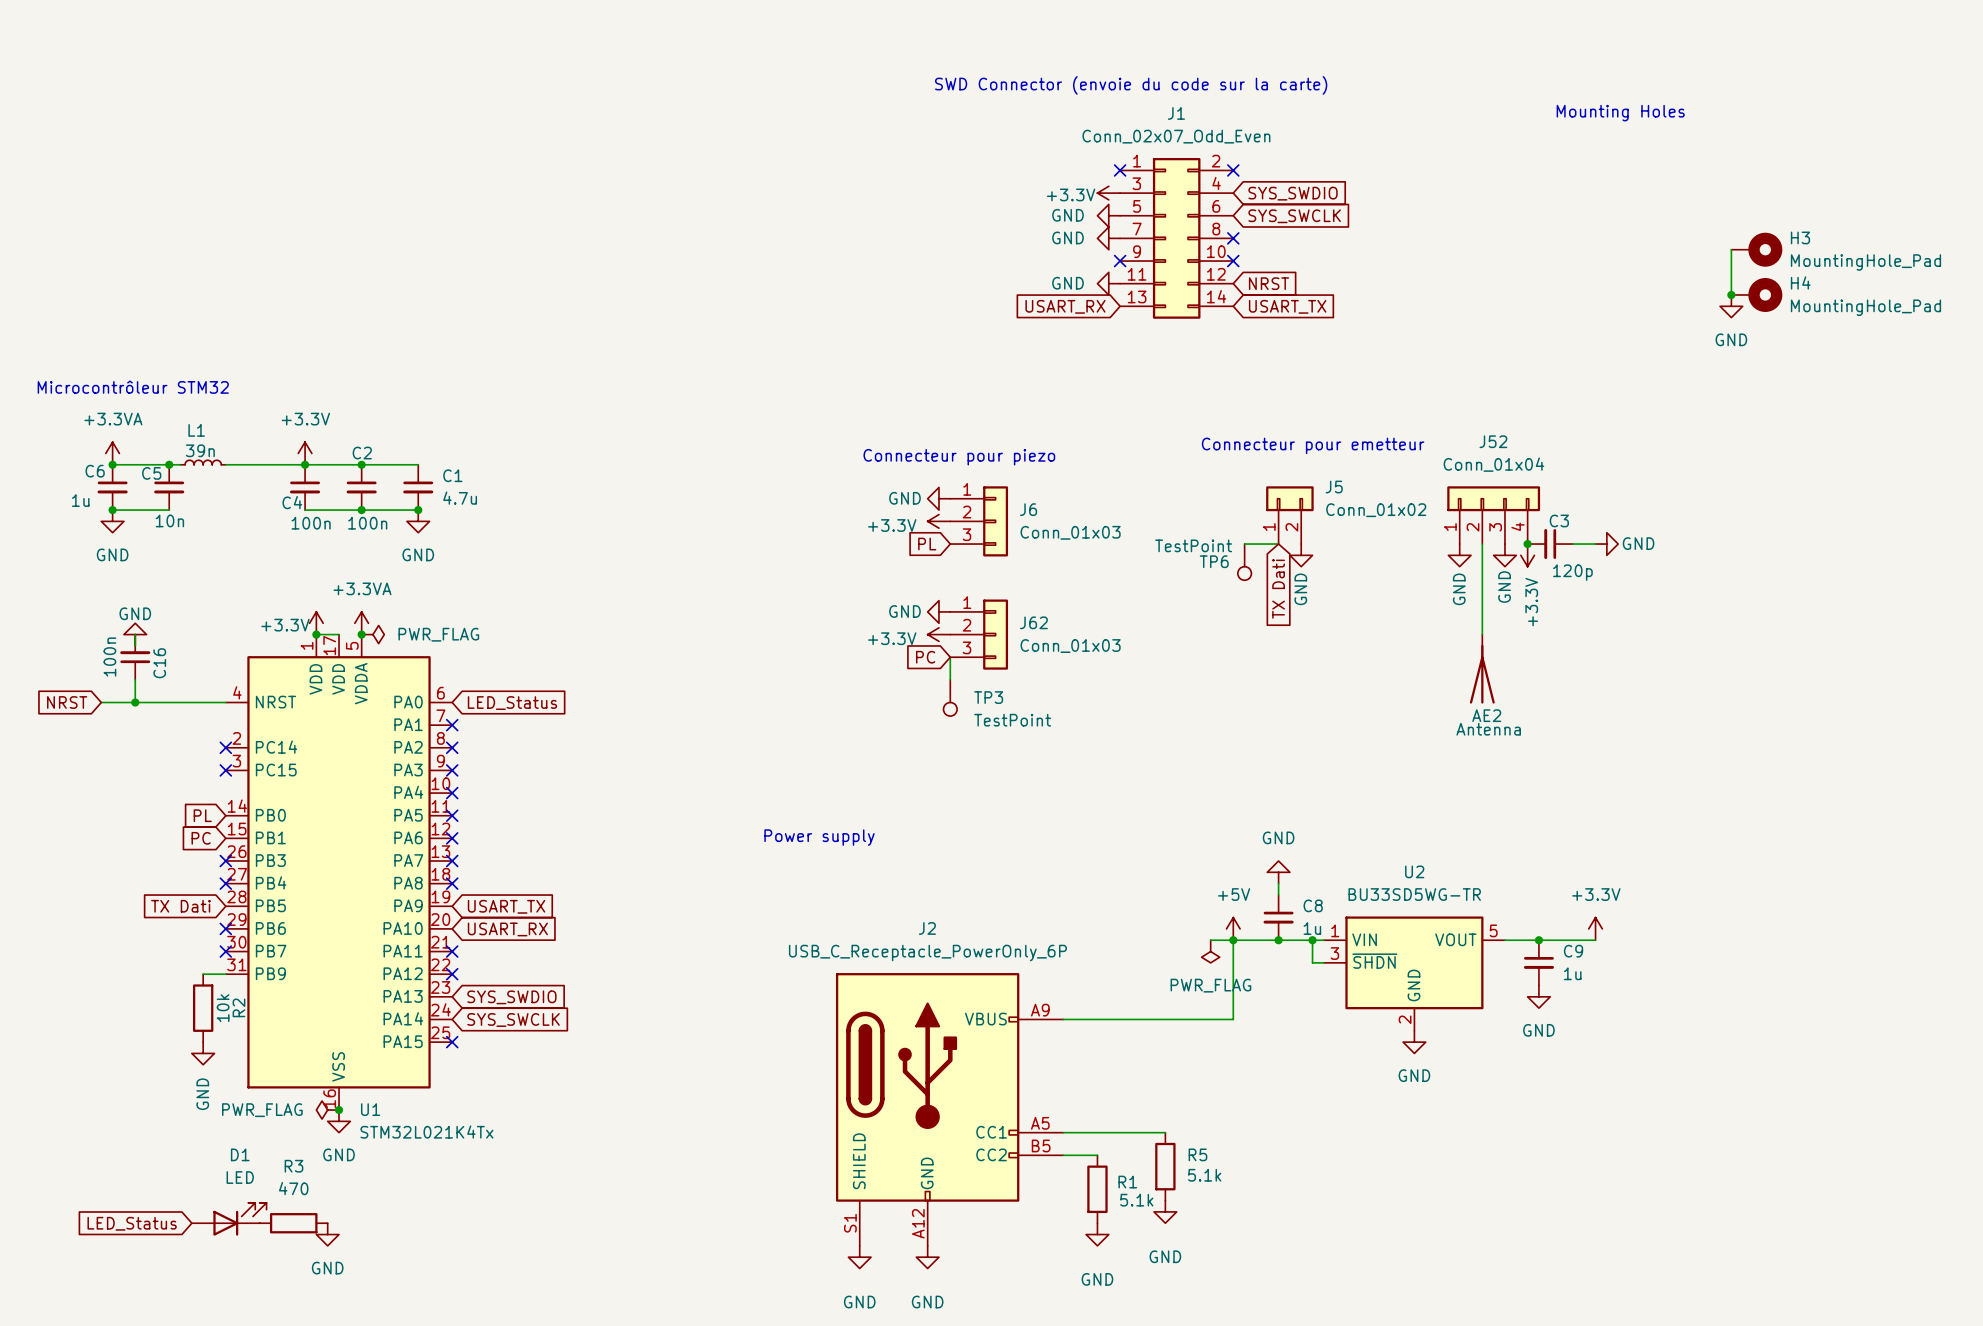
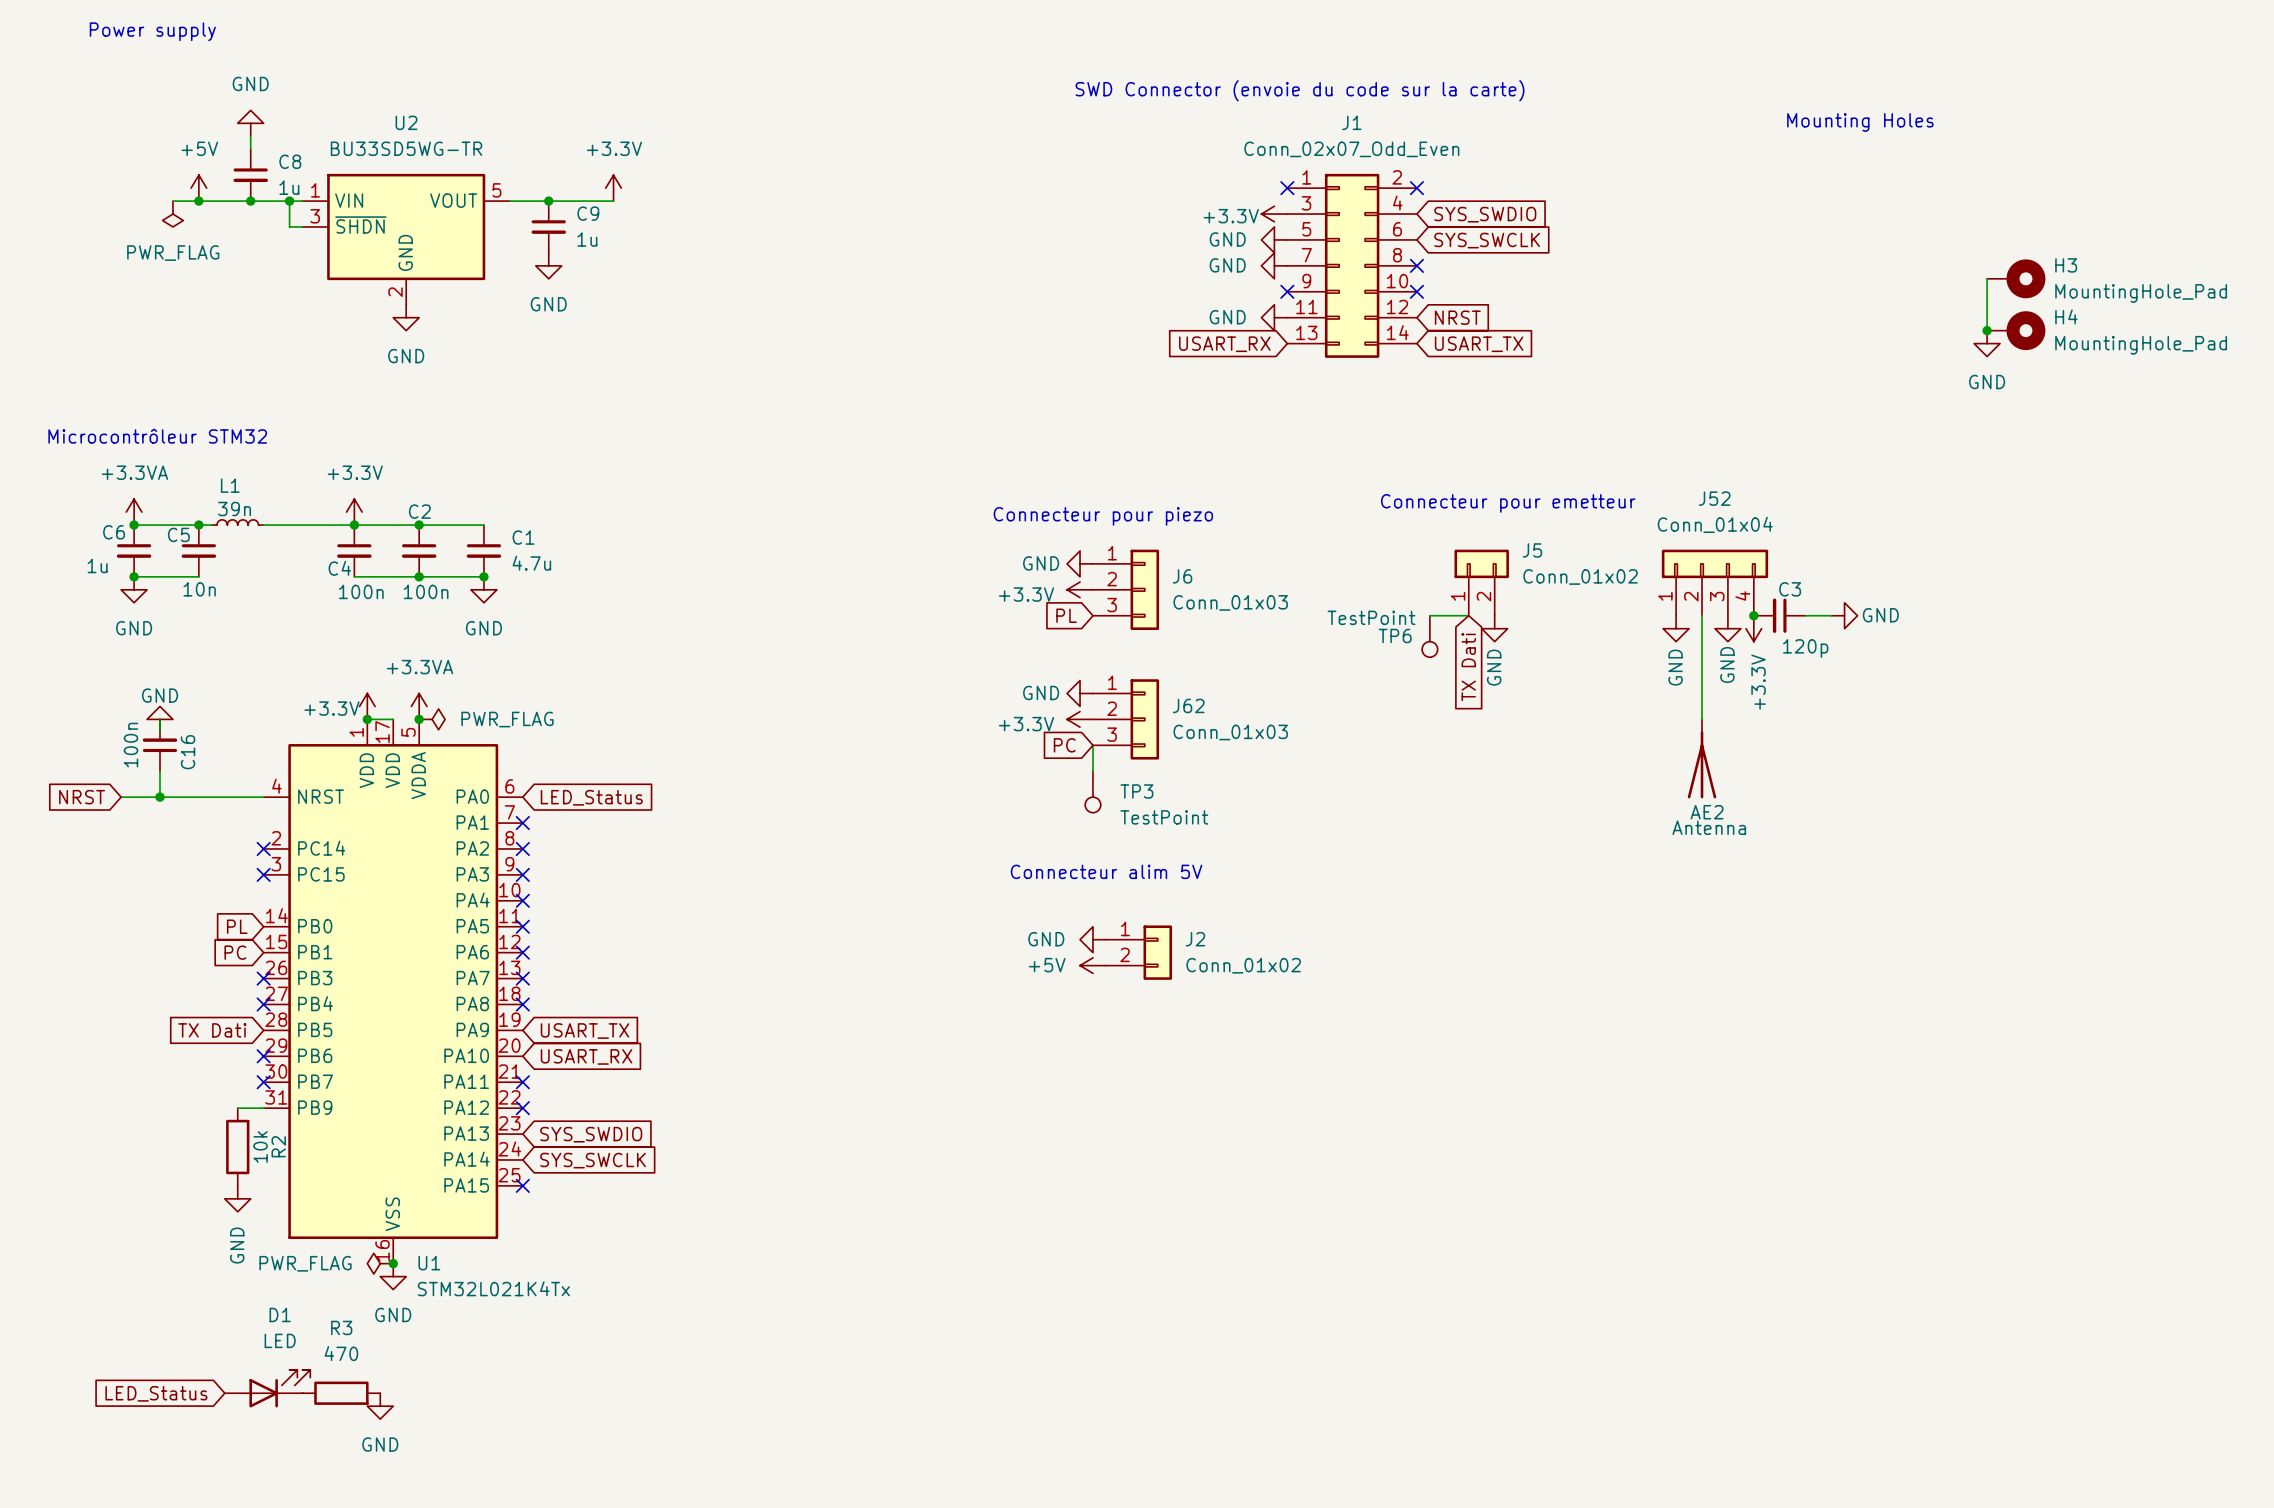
text: none -> Power supply (152, 31)
power symbol: none -> GND (250, 123)
wire: none -> (250, 136) (250, 149)
power symbol: none -> +5V (198, 188)
power symbol: none -> +3.3V (613, 188)
wire: none -> (172, 201) (302, 201)
junction: none -> (198, 201)
junction: none -> (250, 201)
wire: none -> (289, 201) (289, 226) (302, 226)
junction: none -> (289, 201)
wire: none -> (509, 201) (613, 201)
junction: none -> (548, 201)
power symbol: none -> PWR_FLAG (172, 214)
power symbol: none -> GND (548, 265)
power symbol: none -> GND (406, 317)
text: none -> Connecteur alim 5V (1106, 871)
power symbol: none -> GND (1092, 939)
text: Power supply (819, 837) -> none
power symbol: none -> +5V (1092, 965)
power symbol: GND (1278, 872) -> none
wire: (1278, 883) (1278, 894) -> none
C8 position: (1278, 917) -> (250, 175)
J2 name position: J2 (927, 928) -> J2 (1195, 939)
power symbol: +5V (1233, 928) -> none
power symbol: +3.3V (1595, 928) -> none
wire: (1210, 940) (1323, 940) -> none
wire: (1233, 940) (1233, 1019) (1063, 1019) -> none
junction: (1233, 940) -> none
junction: (1278, 940) -> none
wire: (1312, 940) (1312, 962) (1323, 962) -> none
junction: (1312, 940) -> none
wire: (1504, 940) (1595, 940) -> none
junction: (1538, 940) -> none
power symbol: PWR_FLAG (1210, 951) -> none
J2 value: USB_C_Receptacle_PowerOnly_6P (927, 953) -> Conn_01x02 (1243, 965)
C9 position: (1538, 962) -> (548, 226)
J2 symbol: [835, 973, 1064, 1246] -> [1105, 925, 1173, 980]
U2 position: (1414, 973) -> (406, 239)
power symbol: GND (1538, 996) -> none
power symbol: GND (1414, 1042) -> none
wire: (1063, 1132) (1165, 1132) -> none
wire: (1063, 1155) (1097, 1155) -> none
R5: 5.1k (1165, 1166) -> none
R1: 5.1k (1097, 1189) -> none
power symbol: GND (1165, 1211) -> none
power symbol: GND (1097, 1234) -> none
power symbol: GND (859, 1257) -> none
power symbol: GND (927, 1257) -> none

